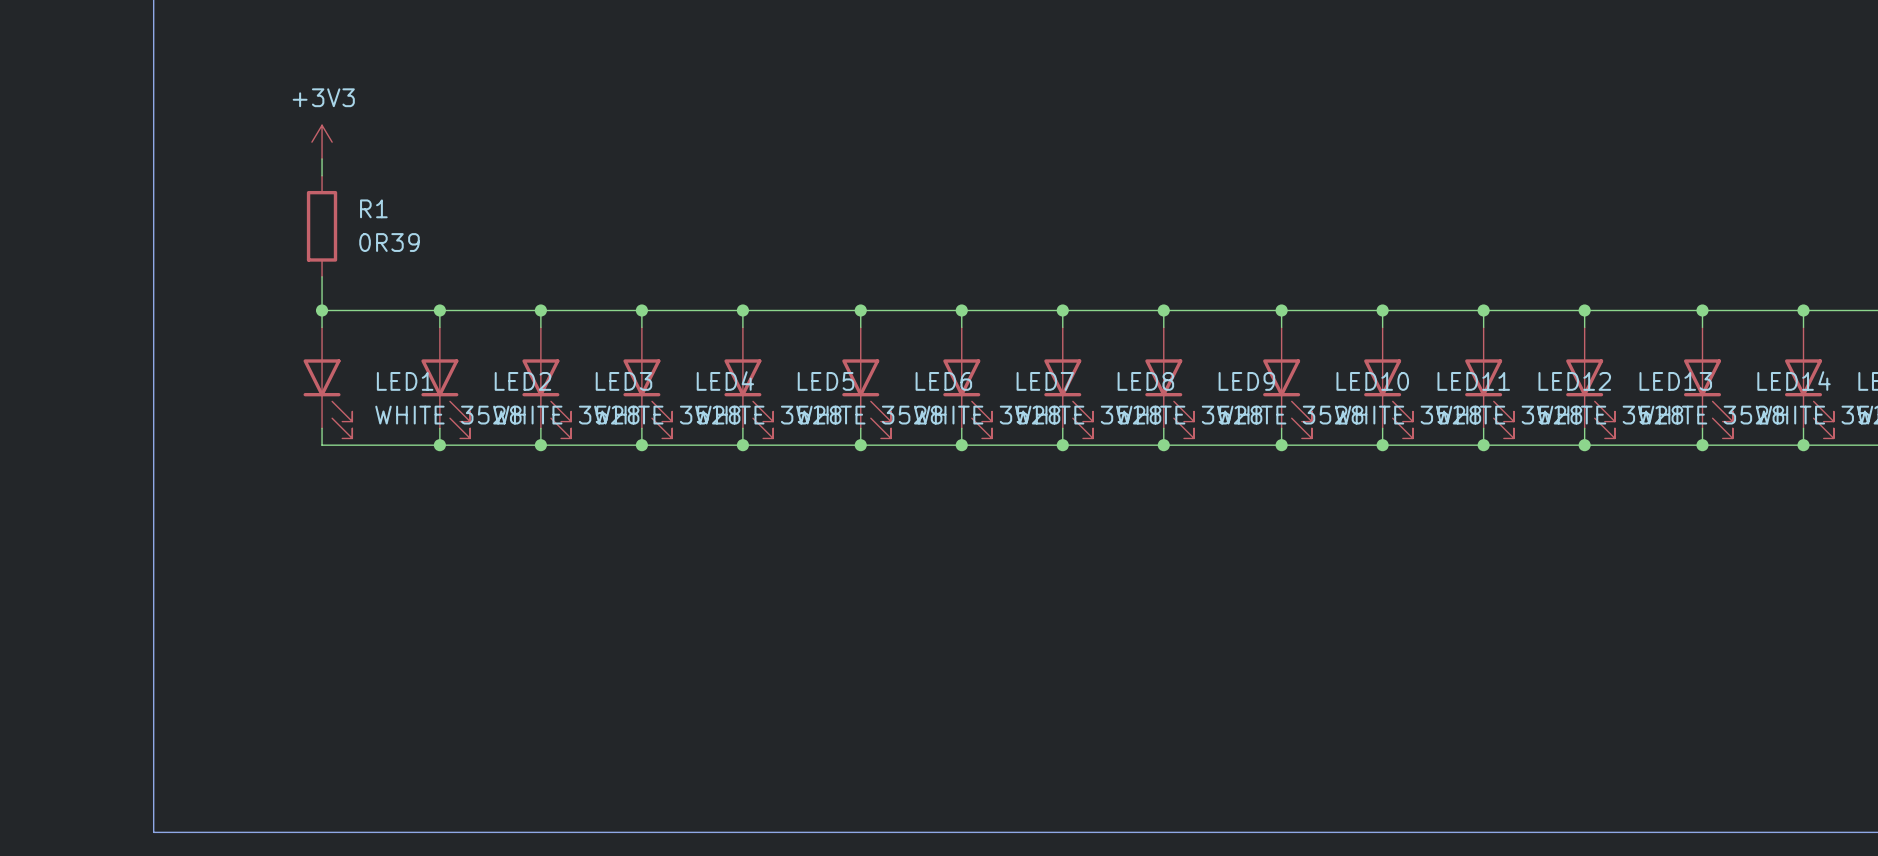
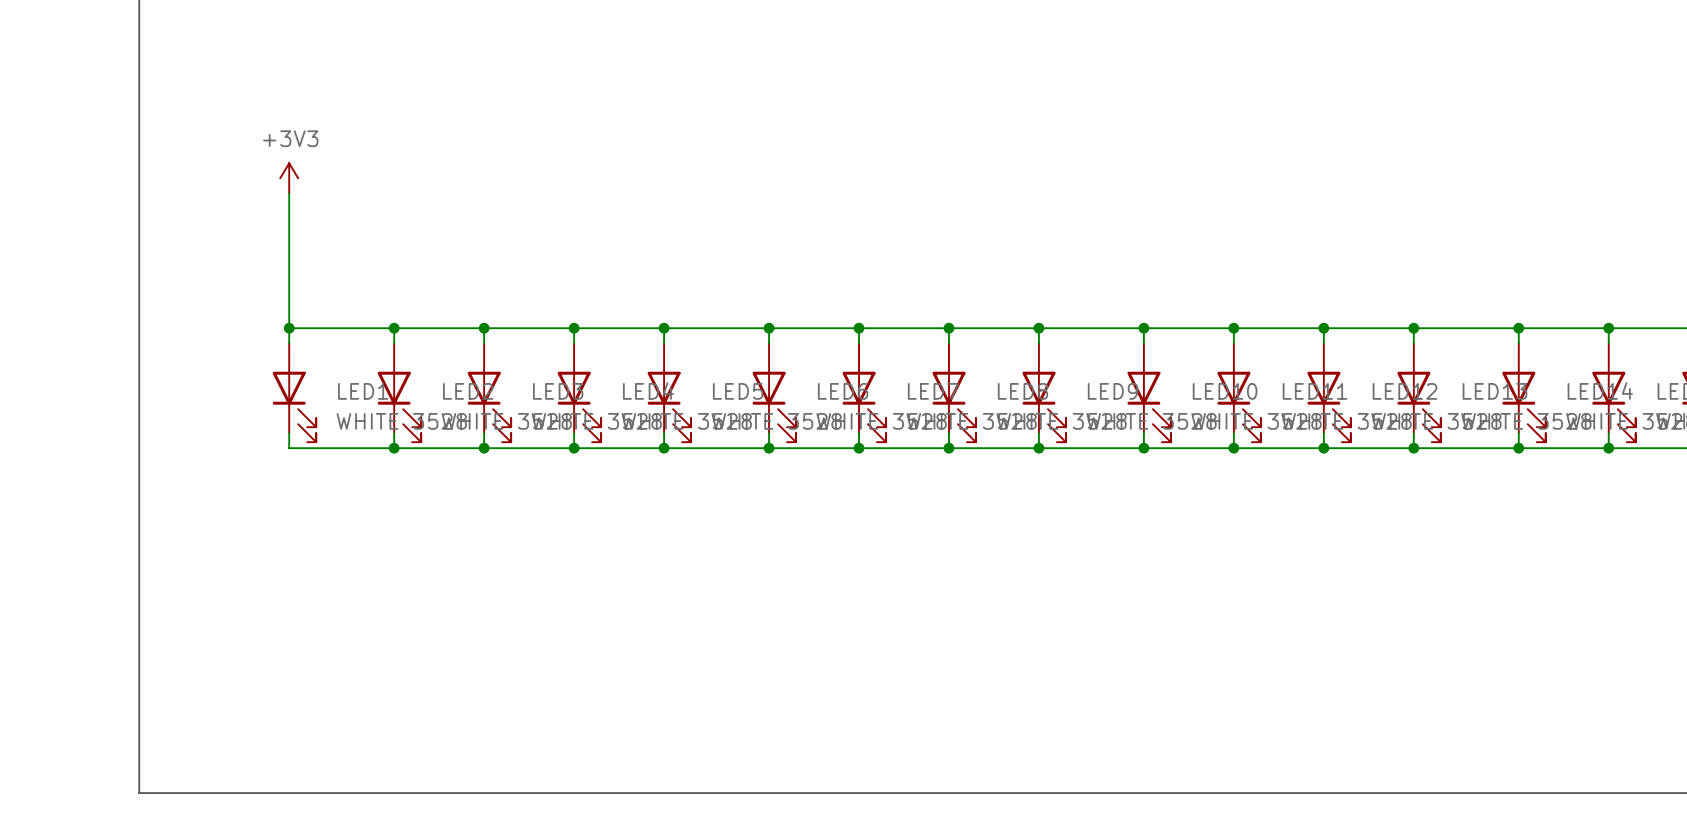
wire: none -> (289, 208) (289, 298)
R1: 0R39 (322, 226) -> none

